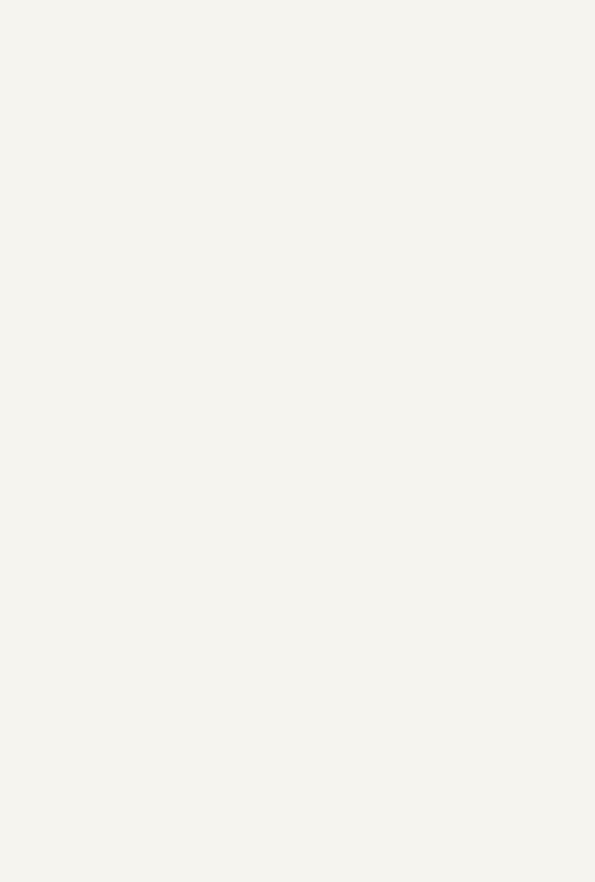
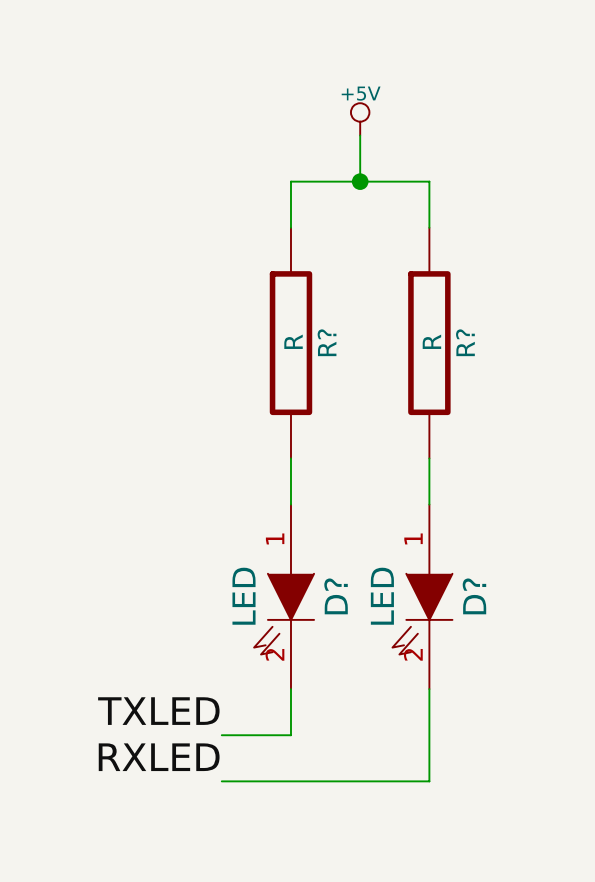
power symbol: none -> +5V (360, 119)
wire: none -> (360, 135) (360, 181)
junction: none -> (360, 181)
wire: none -> (290, 227) (290, 181) (429, 181) (429, 227)
R?: none -> R (290, 343)
R?: none -> R (429, 343)
wire: none -> (290, 458) (290, 504)
wire: none -> (429, 458) (429, 504)
D?: none -> LED (284, 596)
D?: none -> LED (422, 596)
wire: none -> (290, 689) (290, 735) (221, 735)
wire: none -> (429, 689) (429, 781) (221, 781)
label: none -> TXLED (158, 711)
label: none -> RXLED (159, 757)

